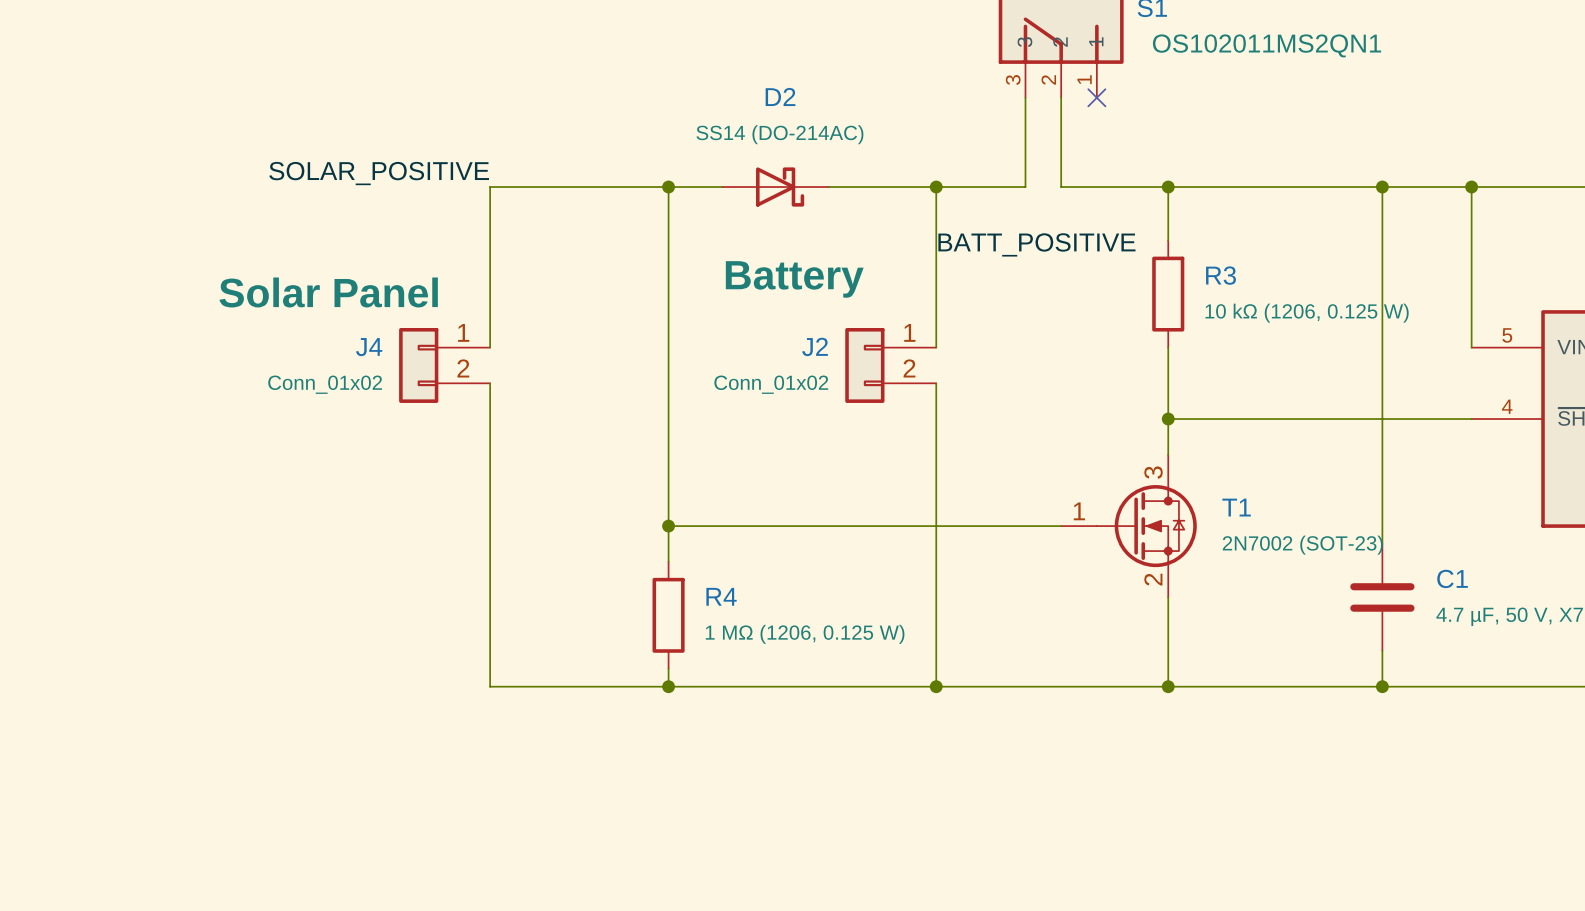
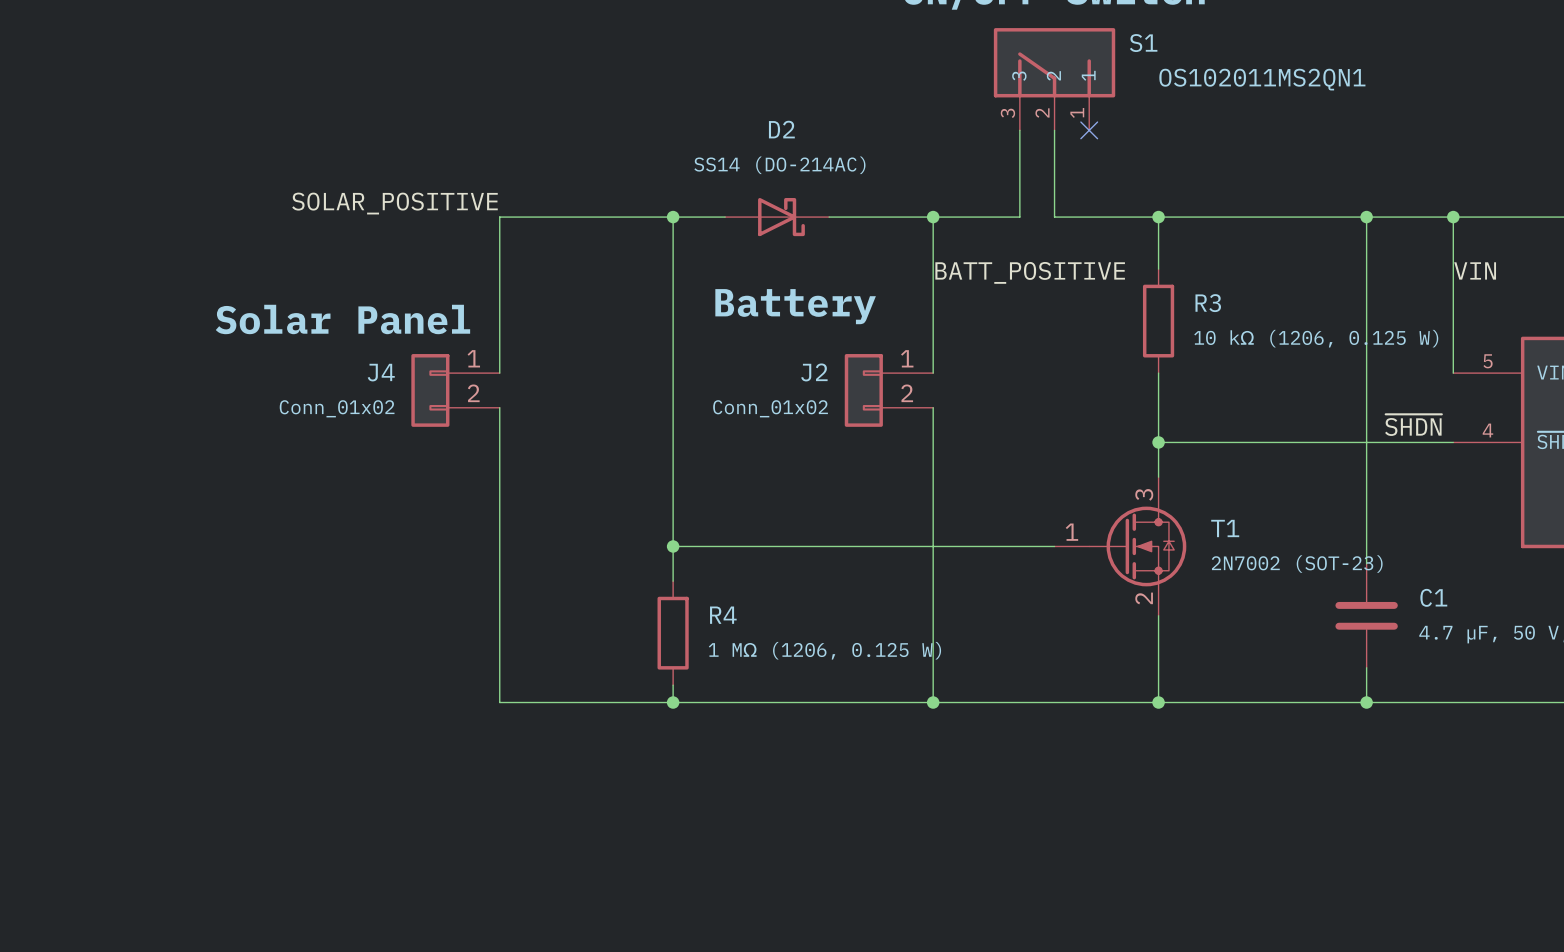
label: none -> VIN (1475, 270)
label: none -> ~{SHDN} (1413, 425)

